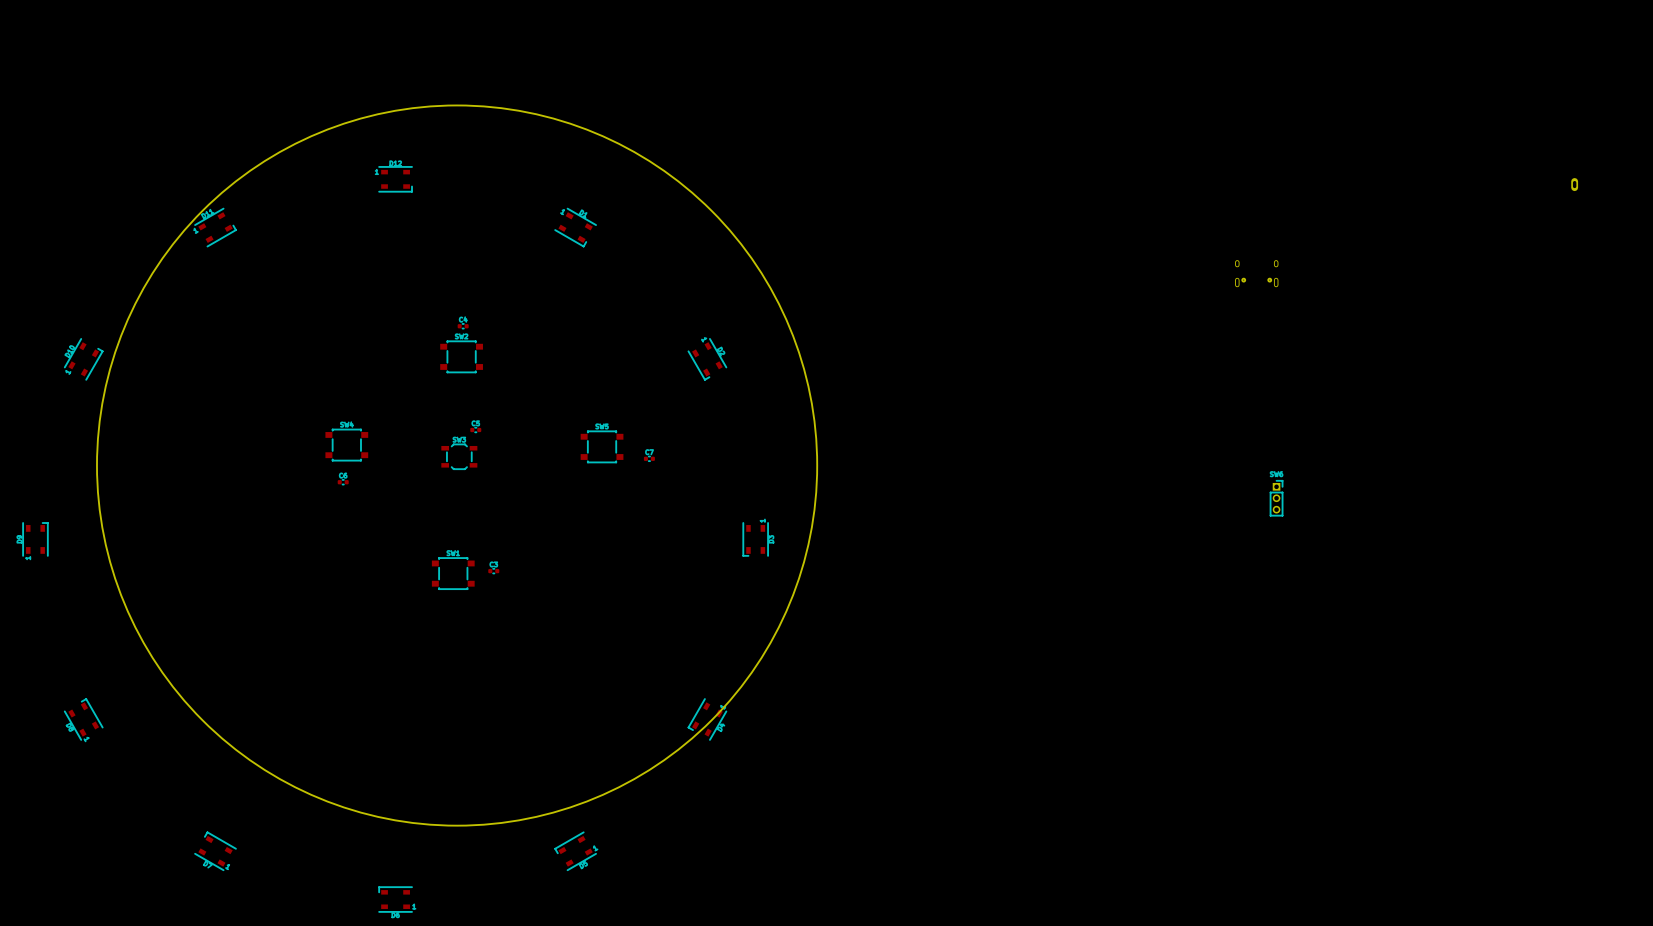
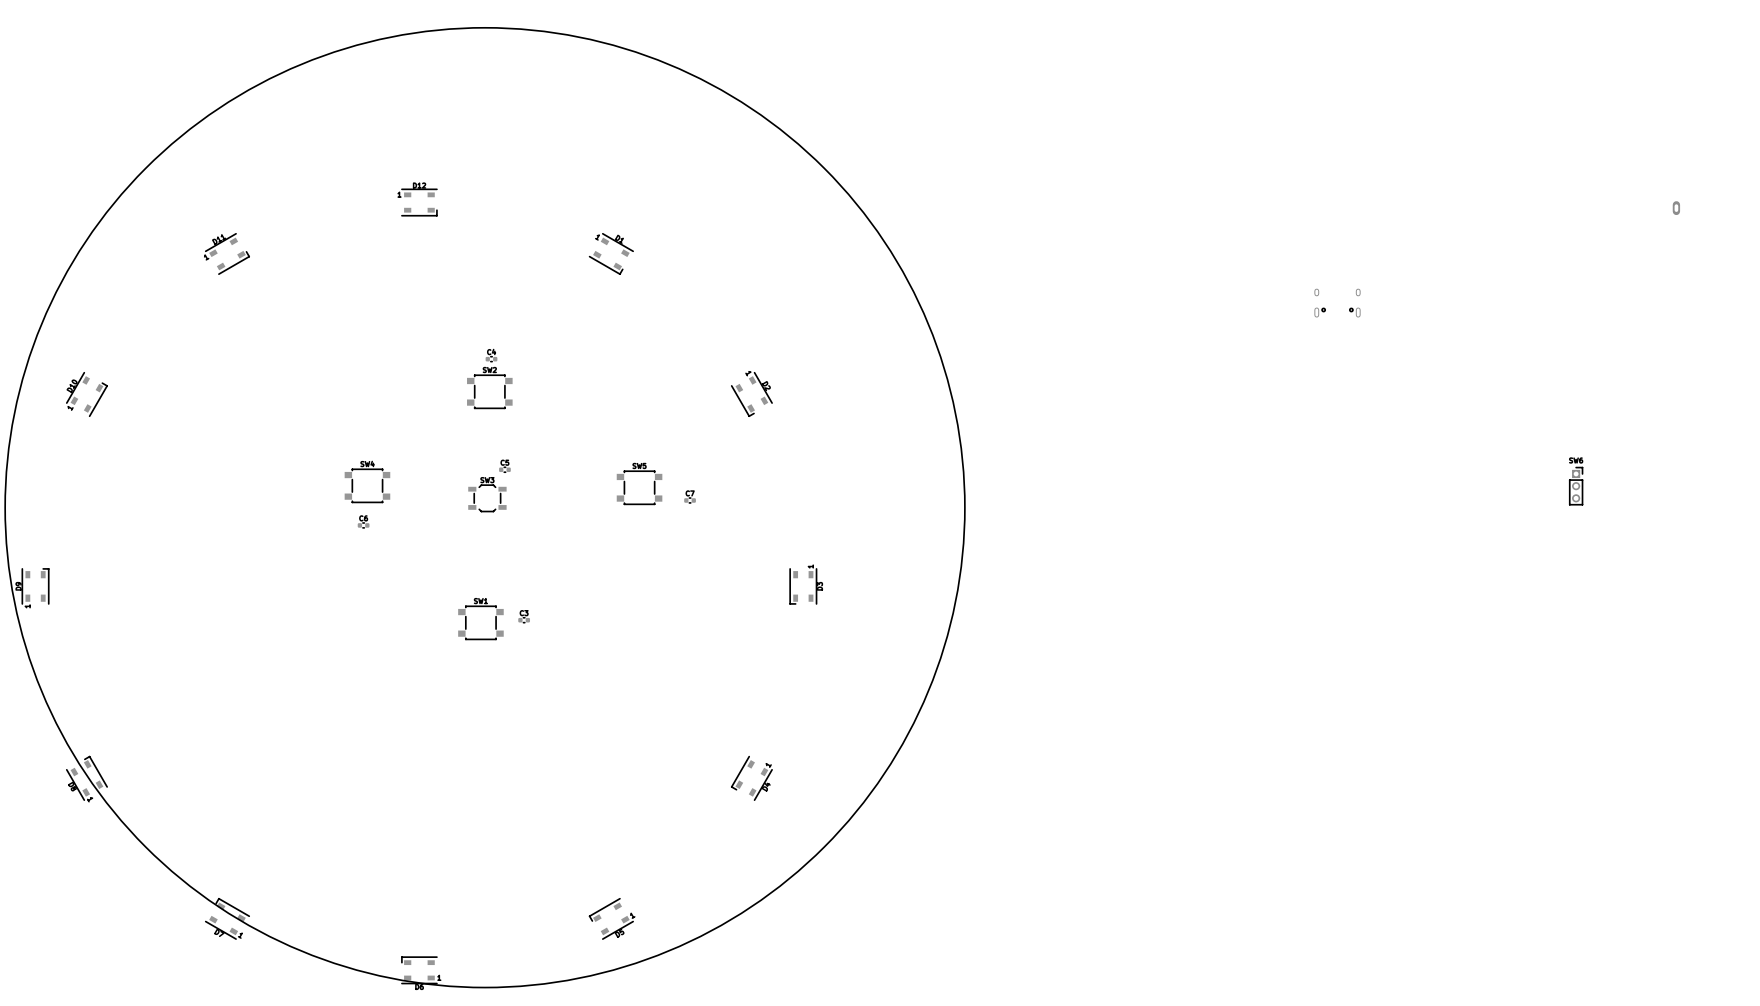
round board edge size: [96, 105, 818, 826] -> [4, 27, 966, 988]
part position: (1276, 498) -> (1576, 486)

